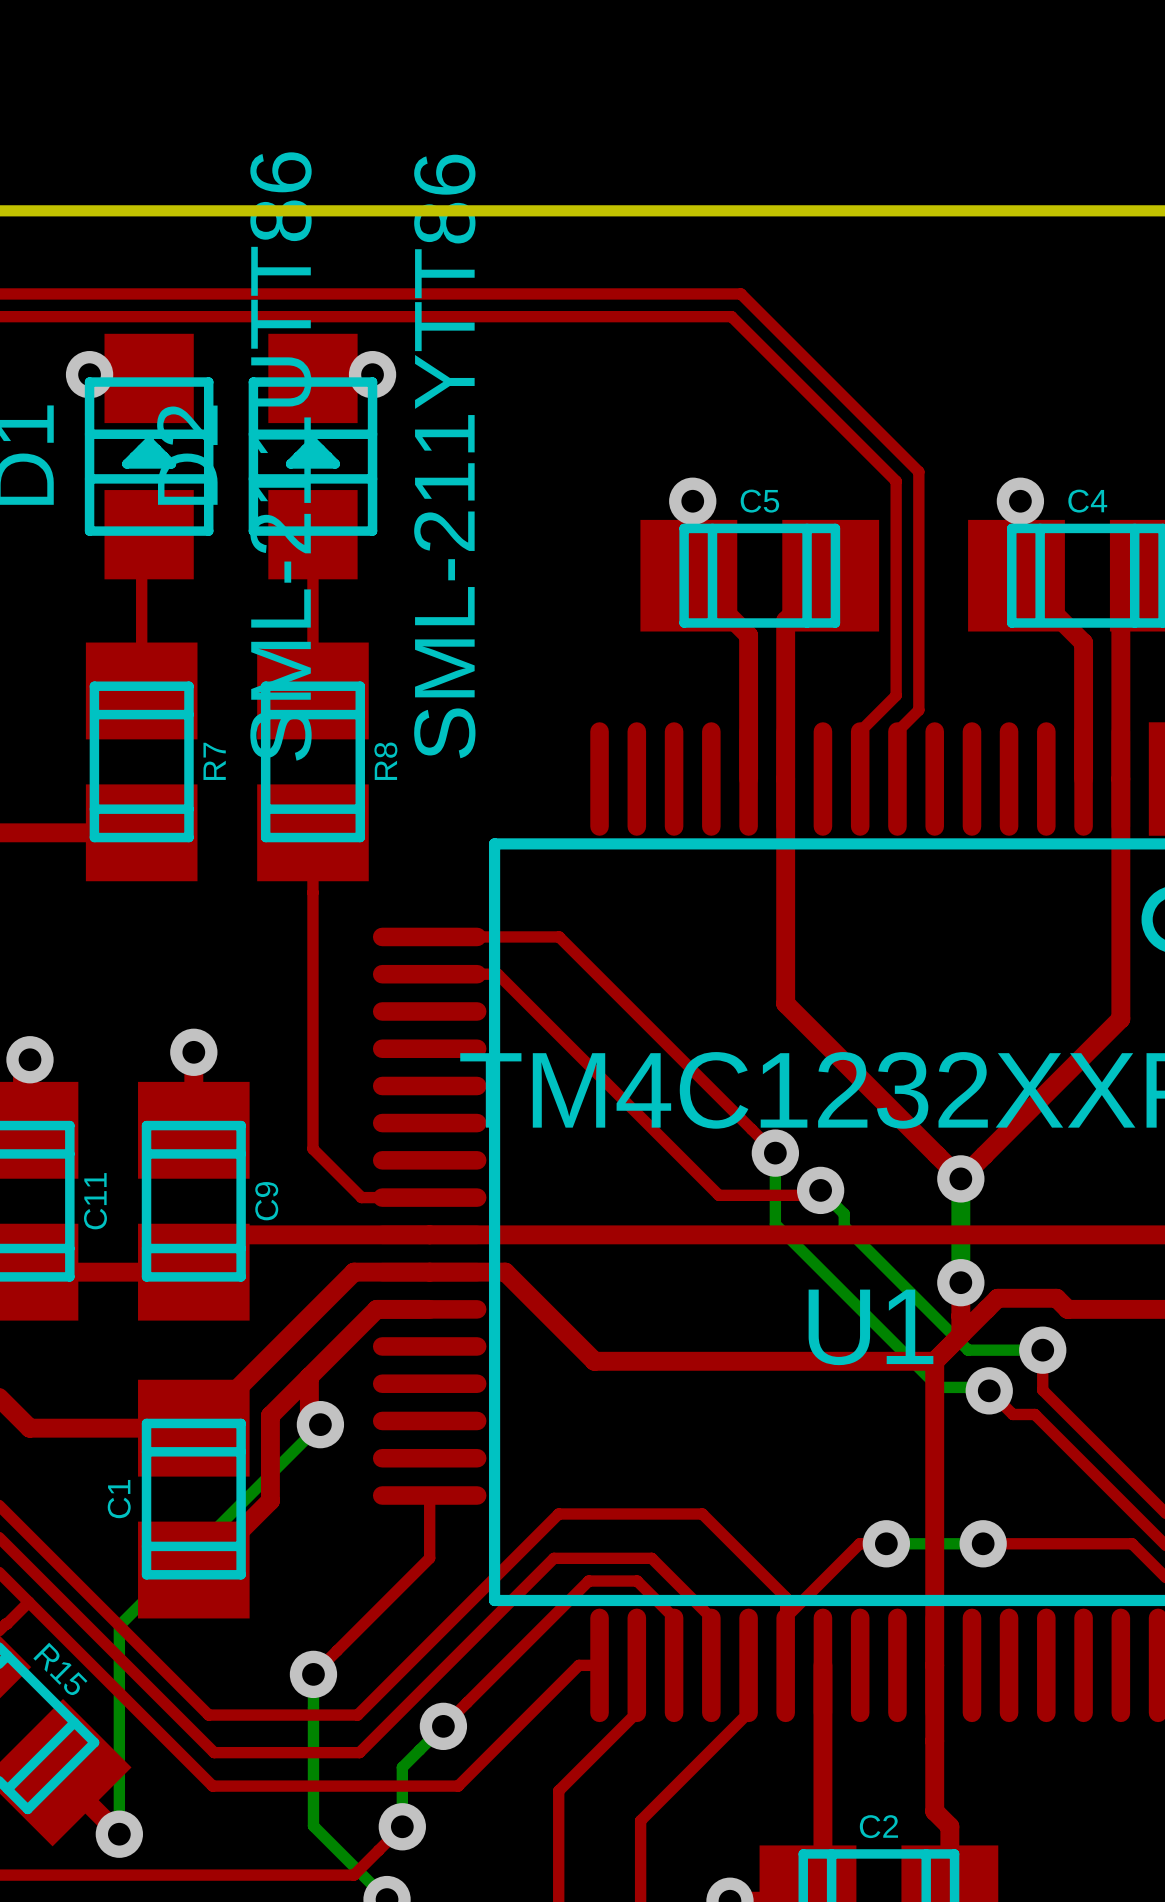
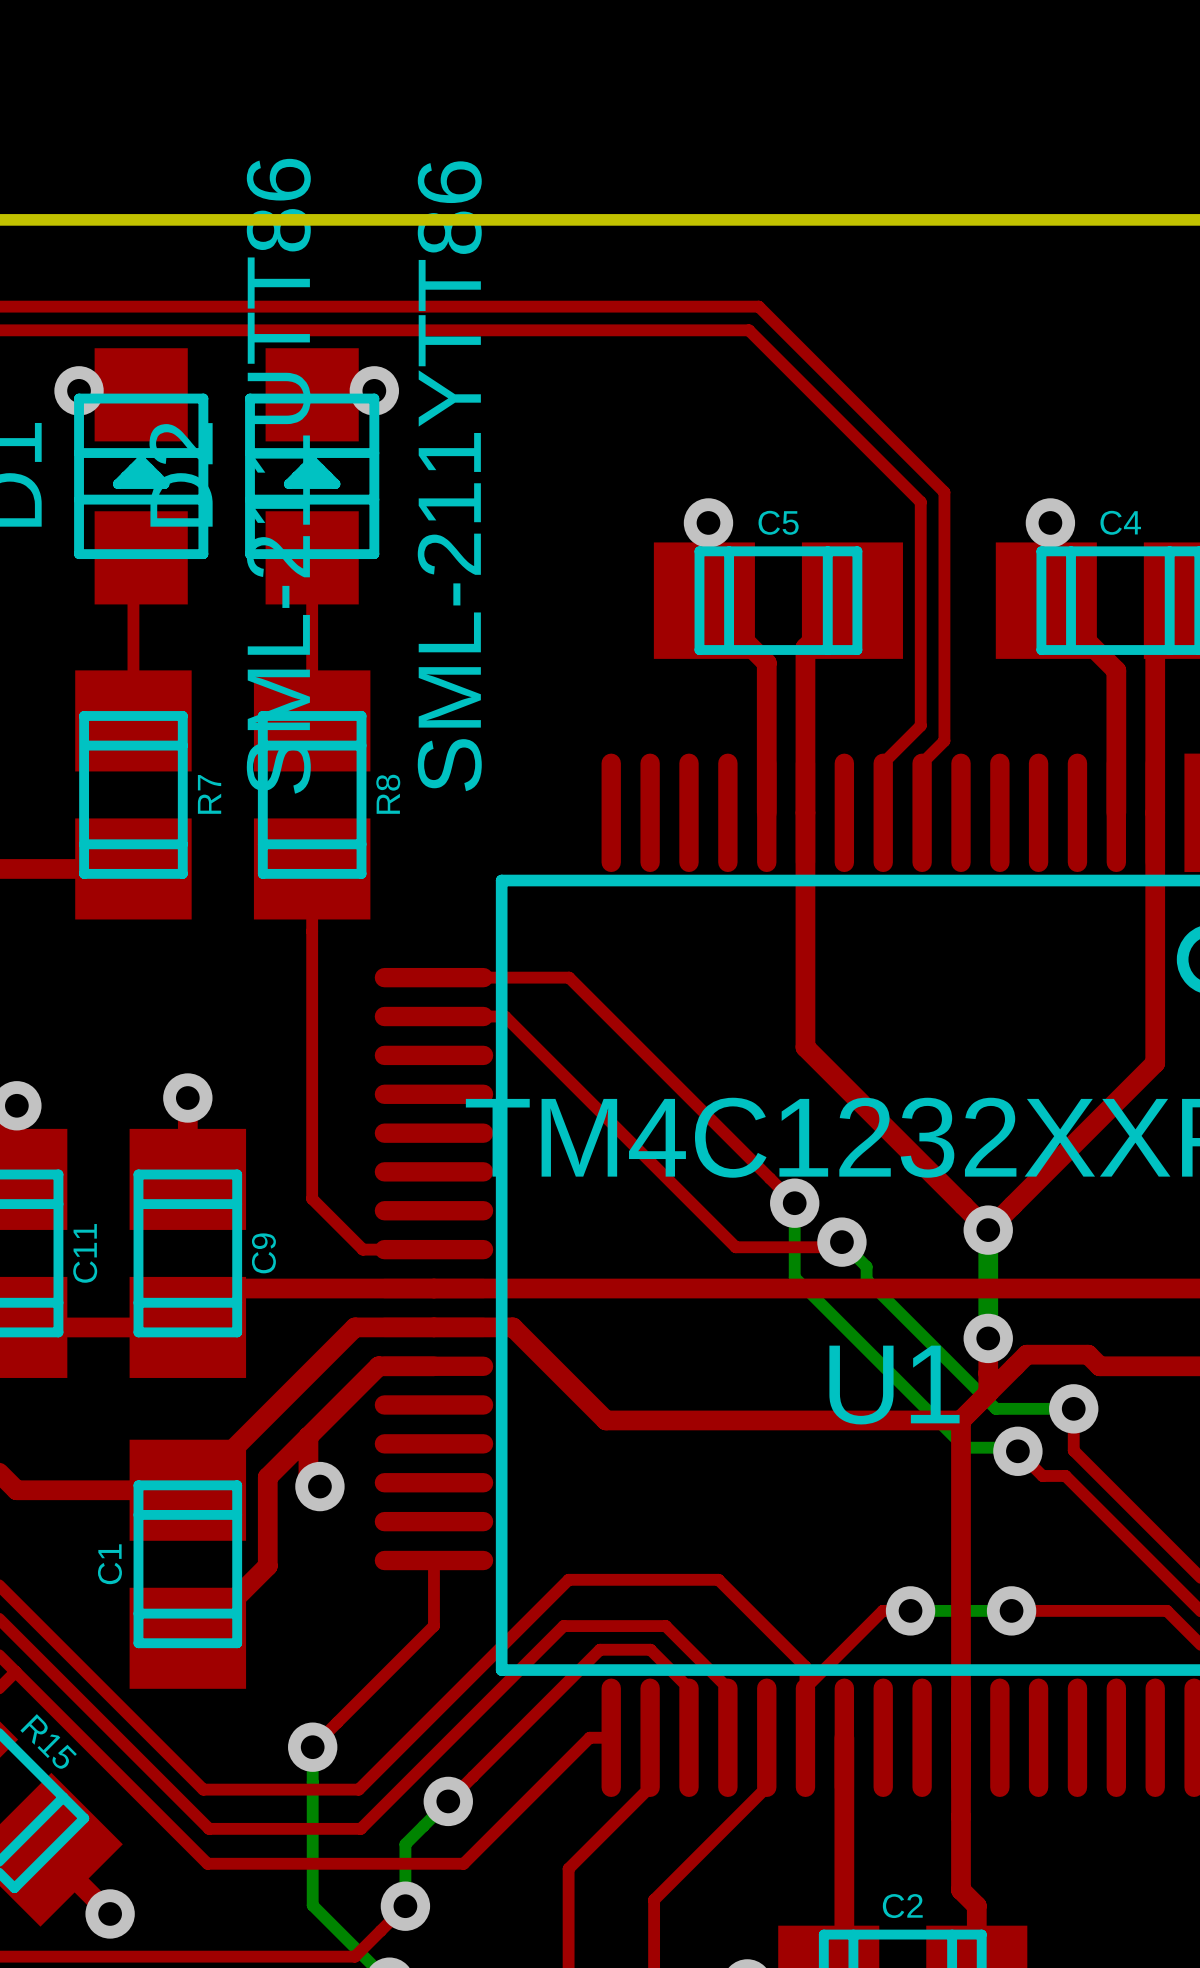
bottom track: (320, 1424) (119, 1625) (119, 1834) -> none

